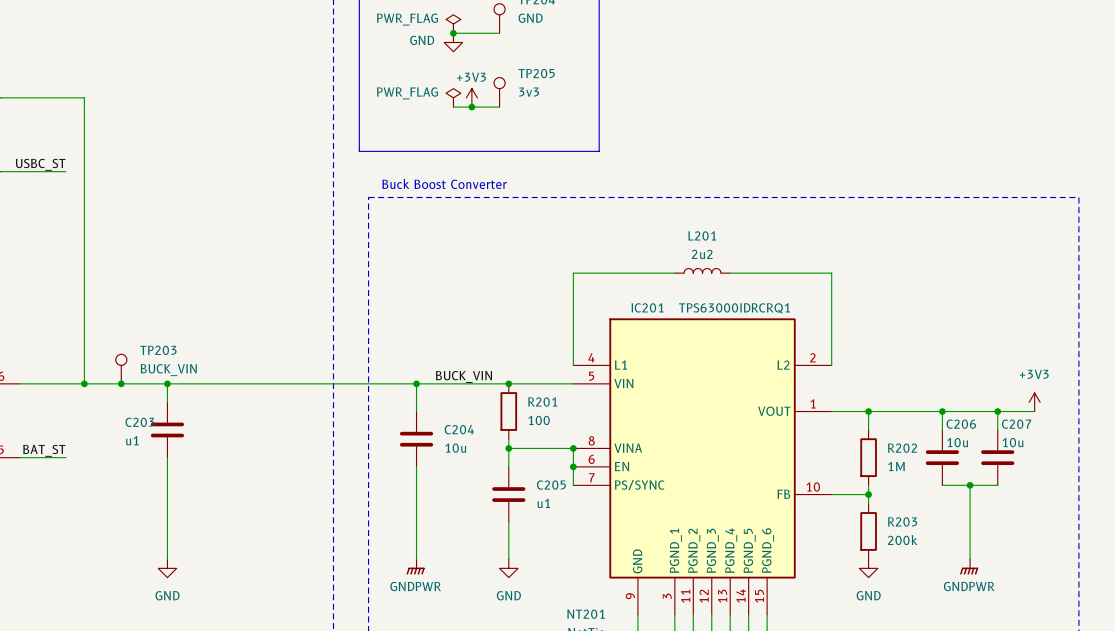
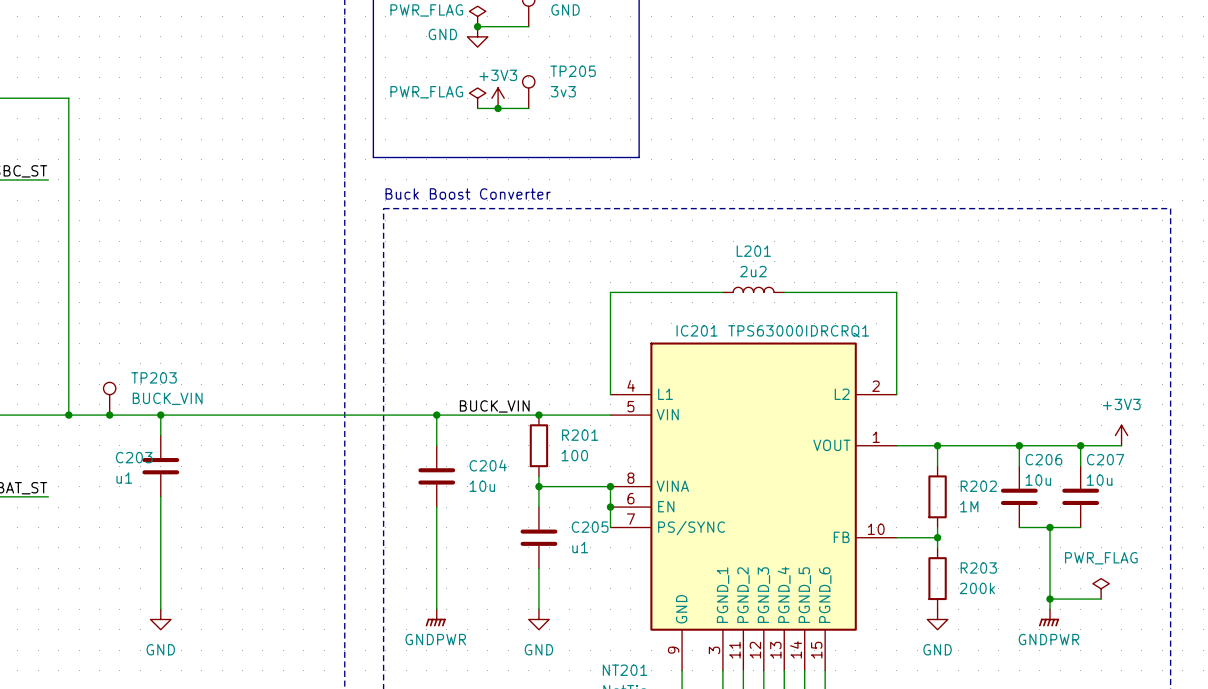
power symbol: none -> PWR_FLAG (1101, 588)
wire: none -> (1050, 599) (1101, 599)
junction: none -> (1050, 599)

